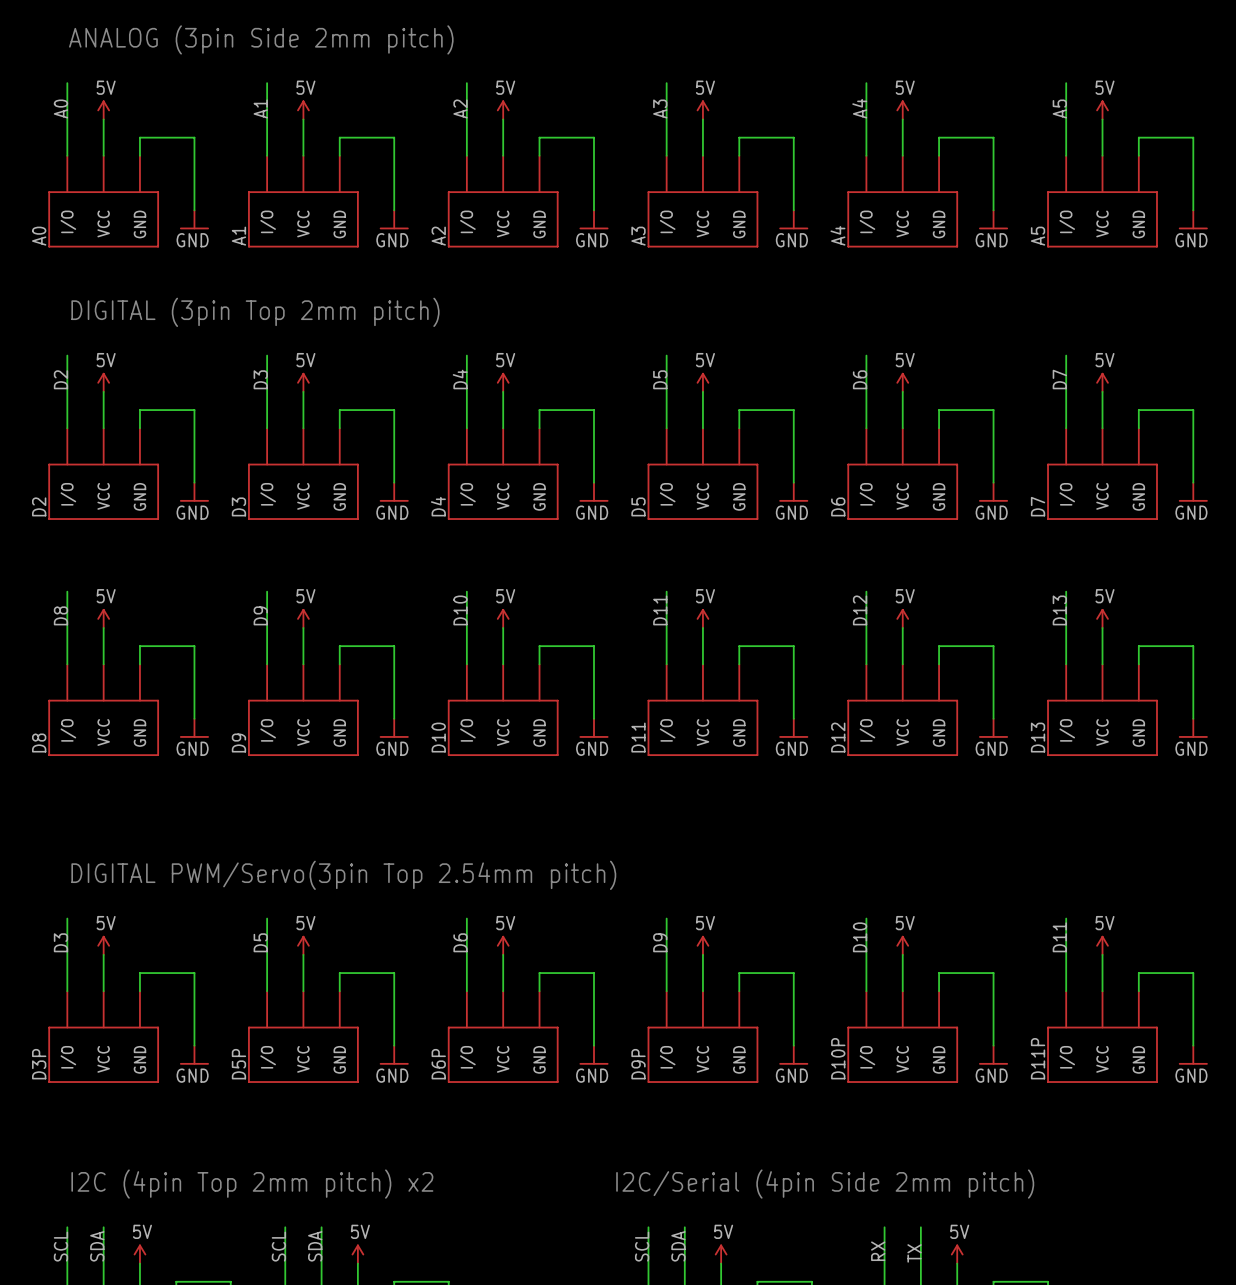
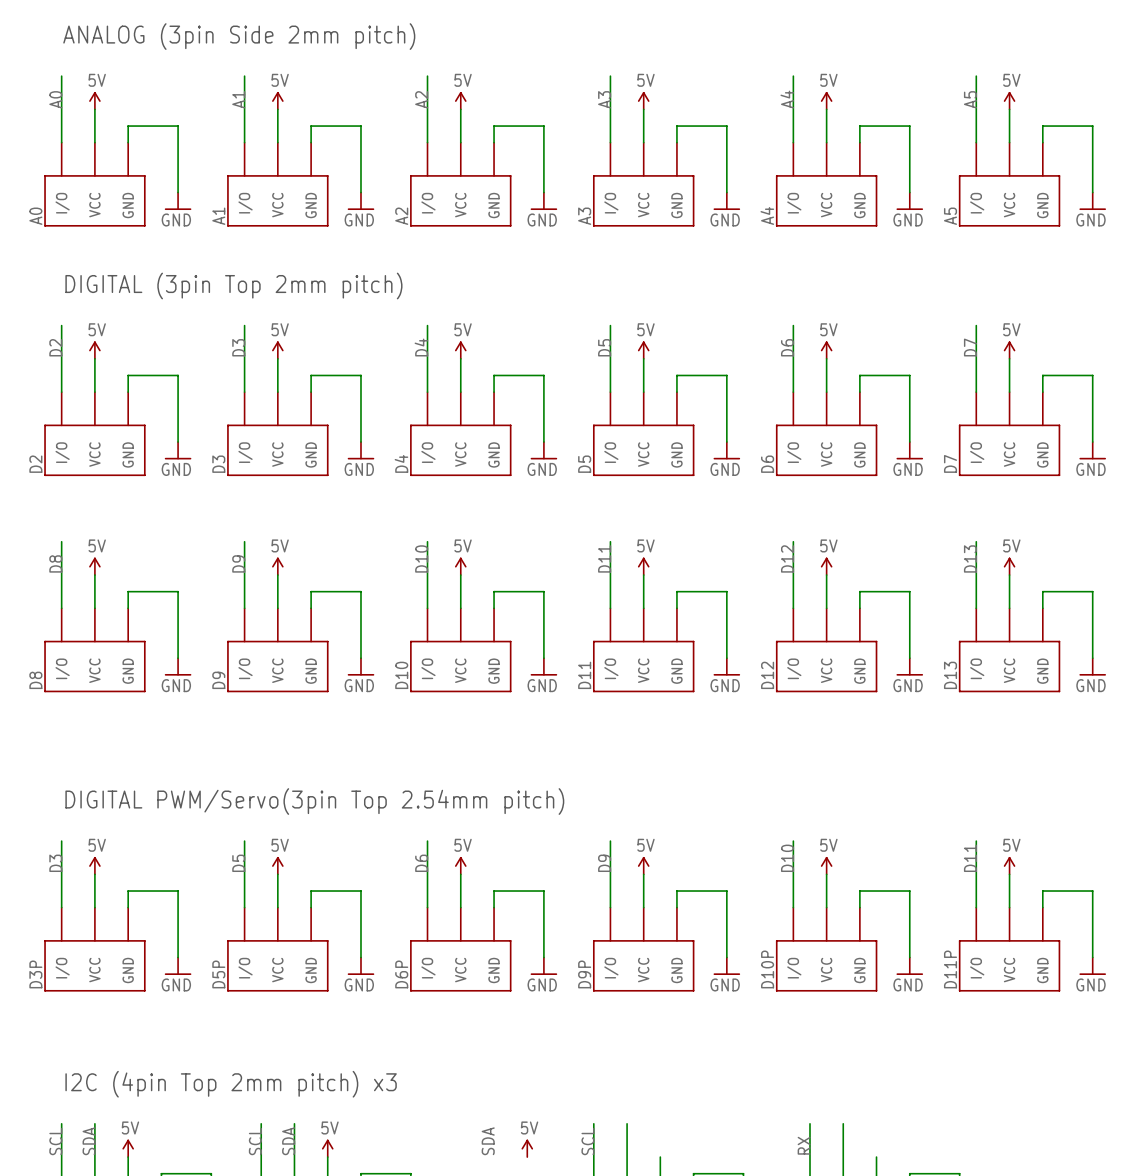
text: I2C (4pin Top 2mm pitch) x2 (252, 1184) -> I2C (4pin Top 2mm pitch) x3 (231, 1084)
text: I2C/Serial (4pin Side 2mm pitch) (825, 1184) -> none
label position: SDA (678, 1246) -> SDA (488, 1141)
label: TX (914, 1253) -> none
power symbol position: 5V (721, 1254) -> 5V (527, 1148)
power symbol: 5V (957, 1254) -> none

